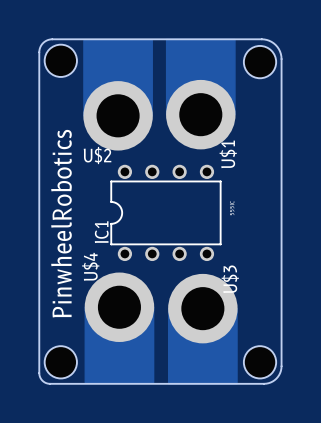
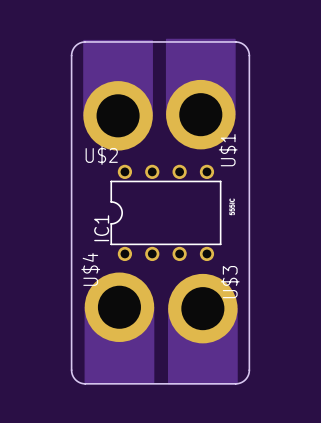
hole: (60, 60) -> none
hole: (260, 62) -> none
text: PinwheelRobotics (61, 223) -> none
hole: (60, 362) -> none
hole: (260, 362) -> none
board edge: (85, 383) (47, 383) (42, 380) (39, 374) (39, 52) (43, 43) (50, 39) (261, 39) (271, 41) (278, 49) (281, 59) (281, 368) (276, 378) (268, 383) (235, 383) -> (85, 383) (75, 379) (71, 370) (71, 55) (75, 45) (85, 41) (235, 41) (242, 43) (248, 50) (249, 370) (245, 379) (235, 383)

